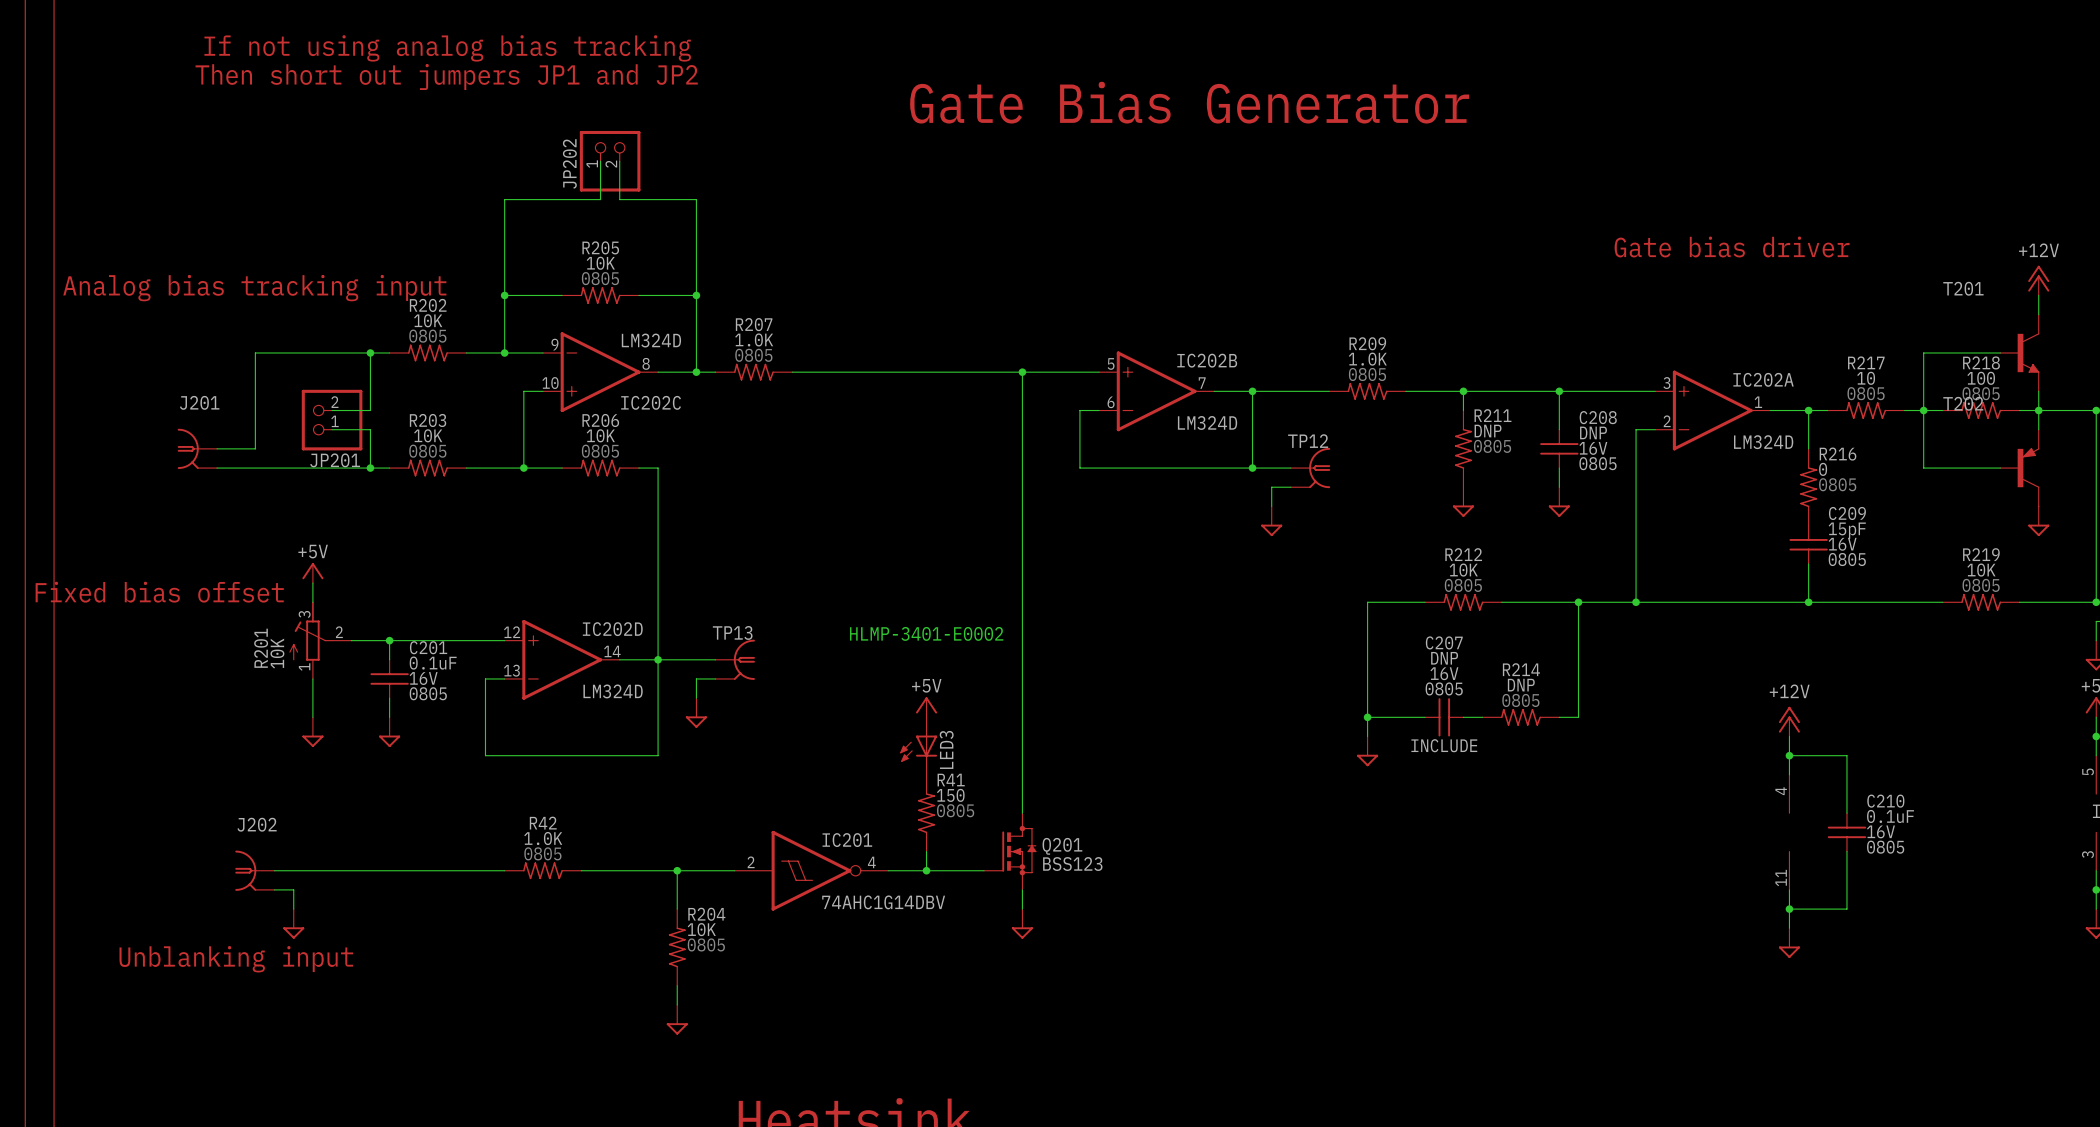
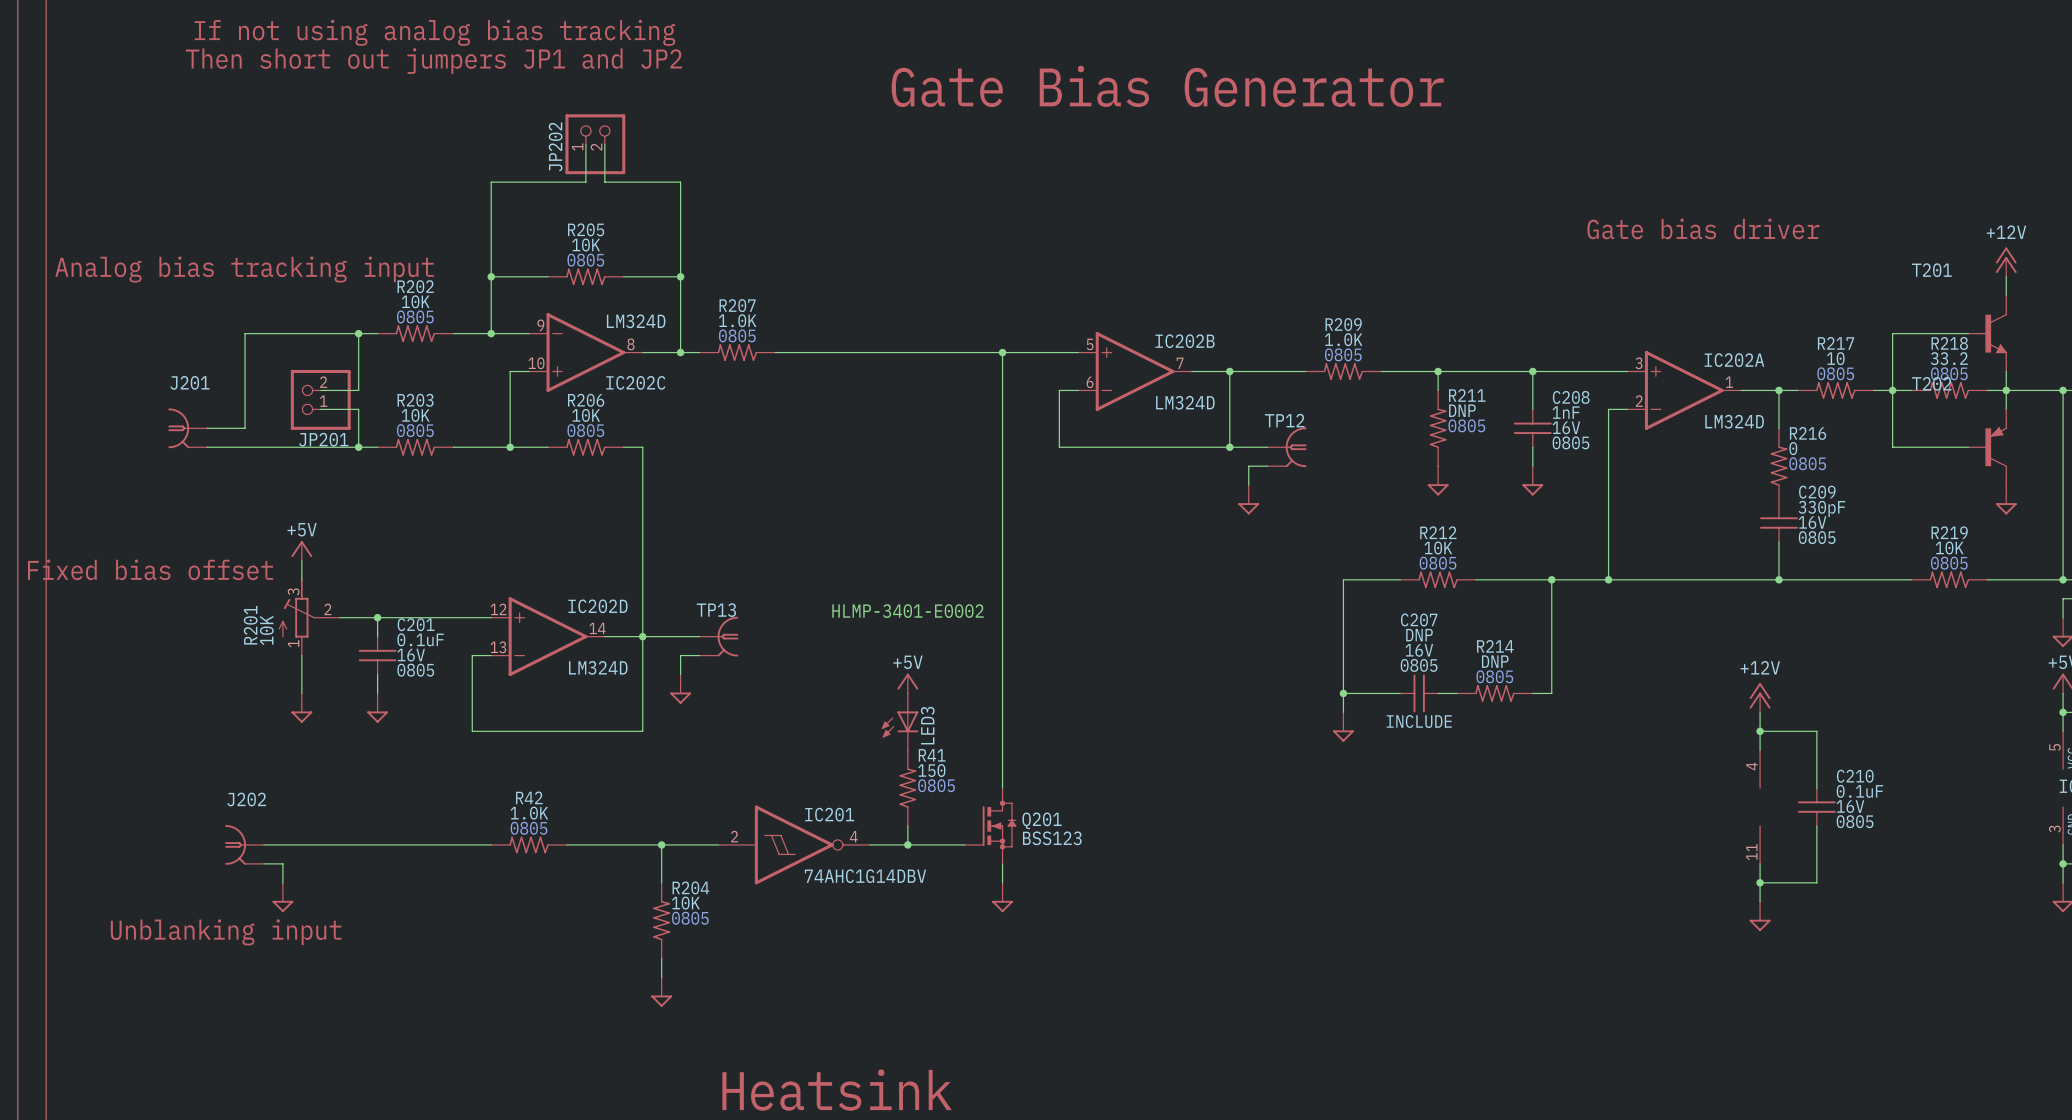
R218 value: 100 (1981, 378) -> 33.2 (1949, 358)
C208 value: DNP (1593, 432) -> 1nF (1566, 412)
C209 value: 15pF (1847, 530) -> 330pF (1821, 508)

